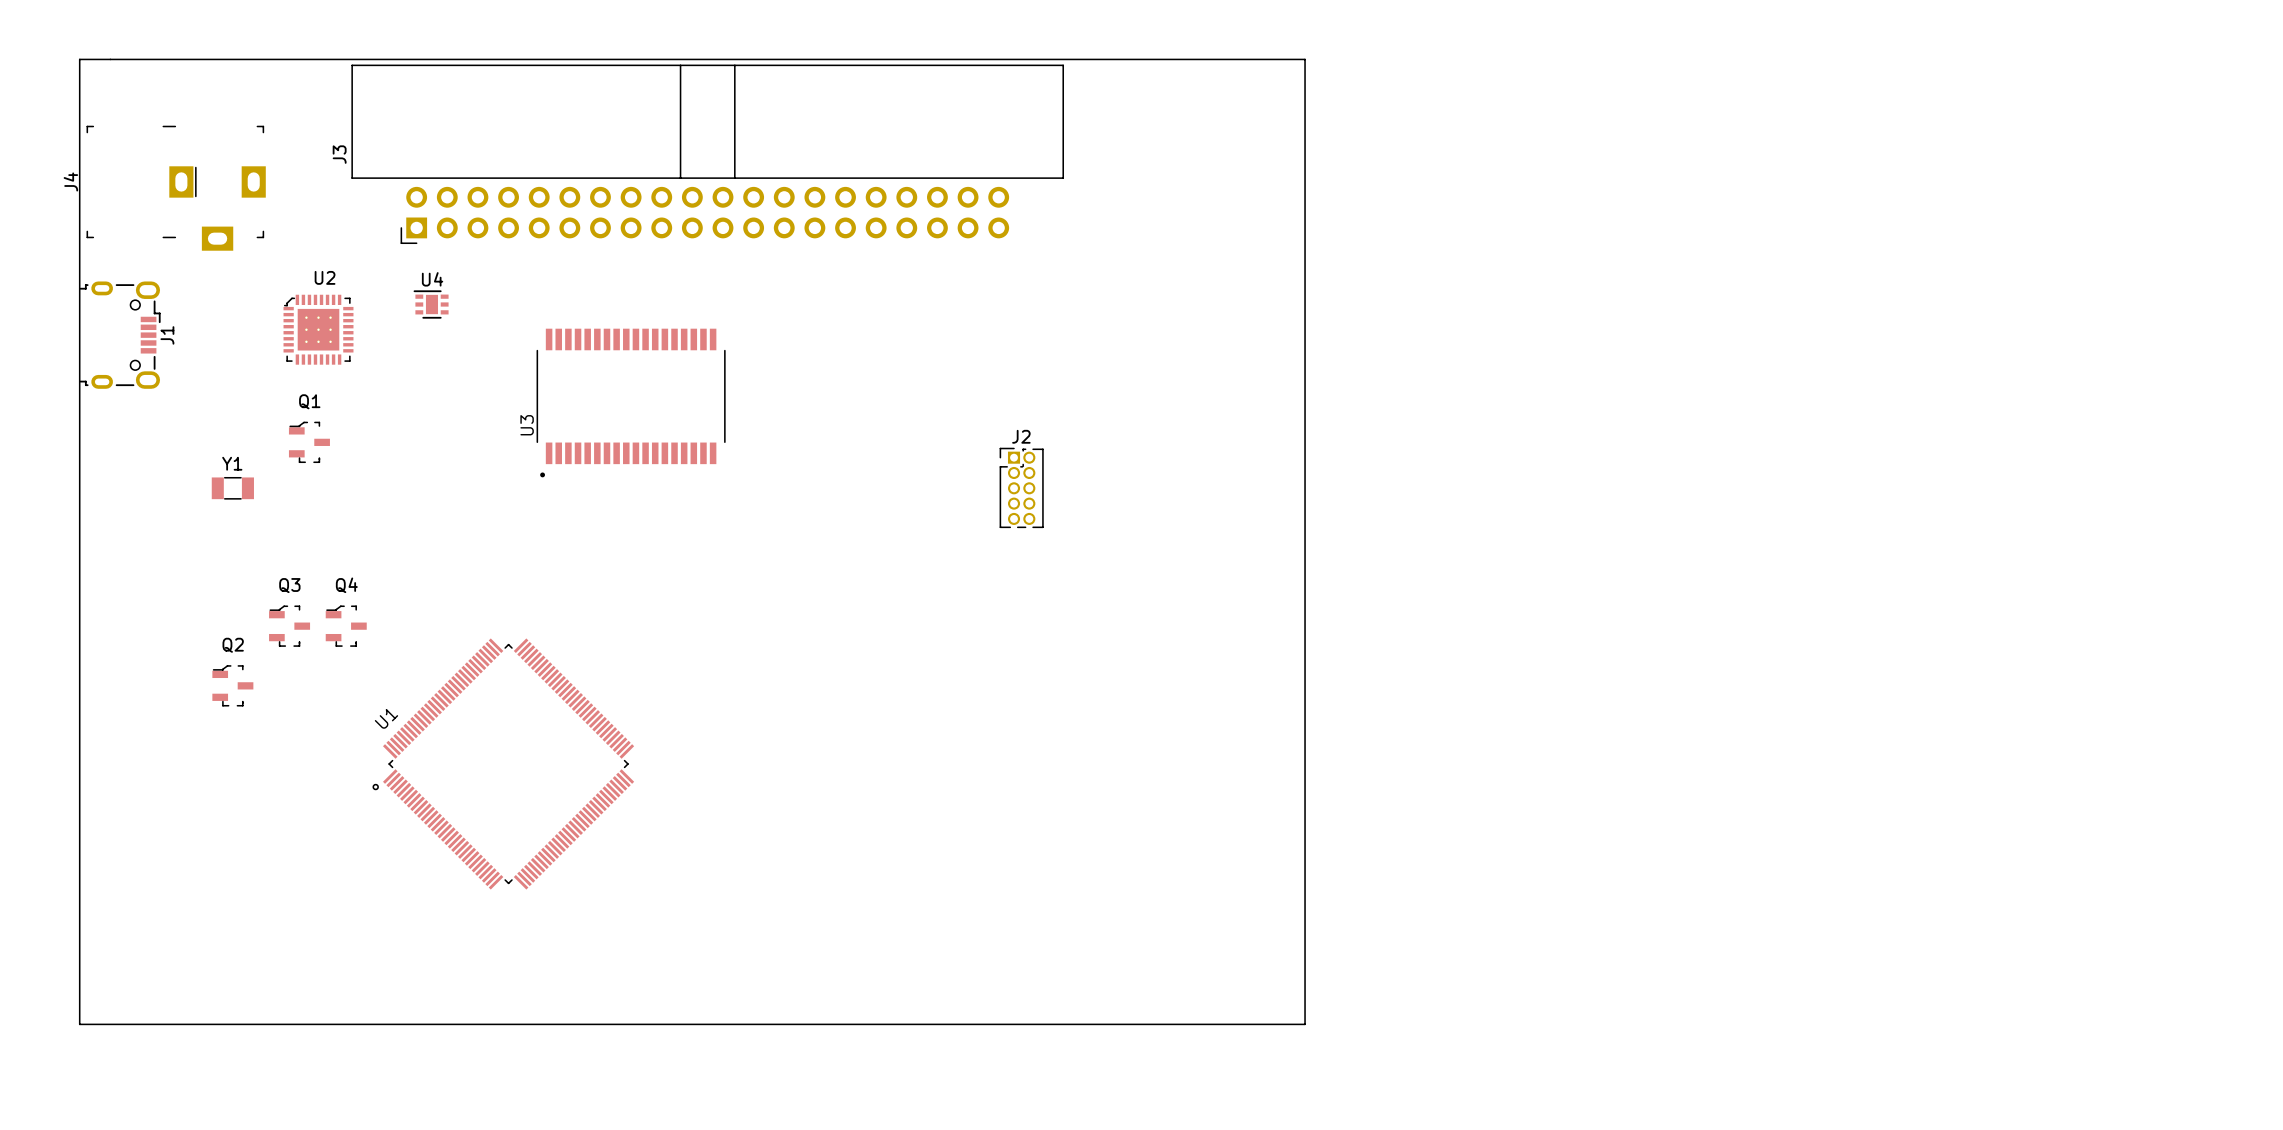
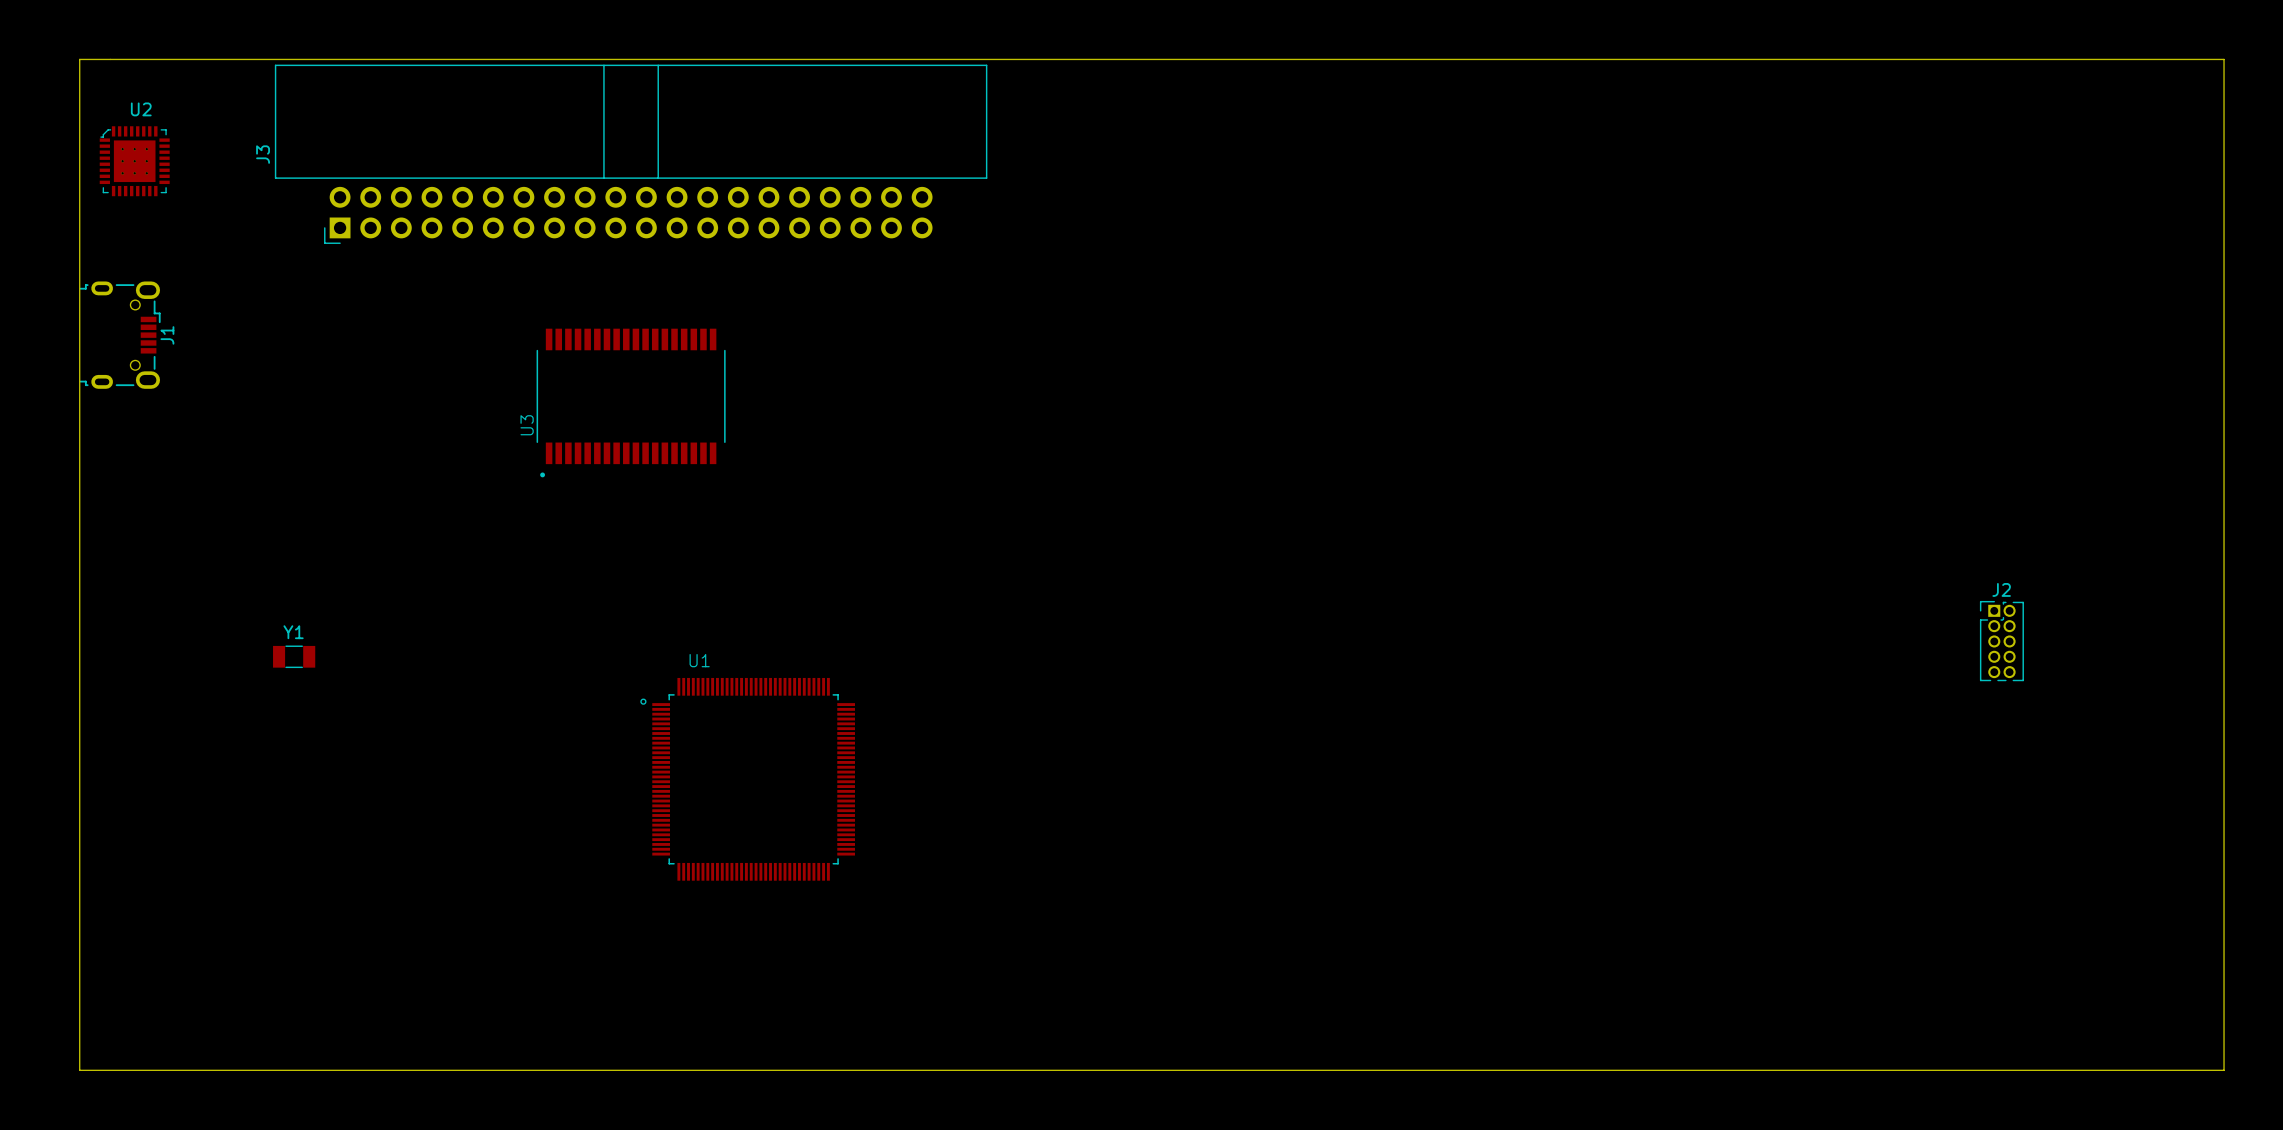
board edge: (1305, 59) (1305, 1024) (79, 1024) -> (1305, 59) (2224, 59) (2224, 1070) (79, 1070) (79, 1024)
J3 position: (707, 154) -> (631, 154)
J4: (176, 188) -> none
U4: (431, 304) -> none
U2 position: (318, 329) -> (134, 161)
Q1: (309, 442) -> none
J2 position: (1021, 487) -> (2001, 641)
Y1 position: (232, 488) -> (294, 656)
Q3: (289, 626) -> none
Q4: (346, 626) -> none
Q2: (232, 685) -> none
U1 rotation: 0° (503, 764) -> 45° clockwise (747, 779)
U1 position: (503, 764) -> (747, 779)

